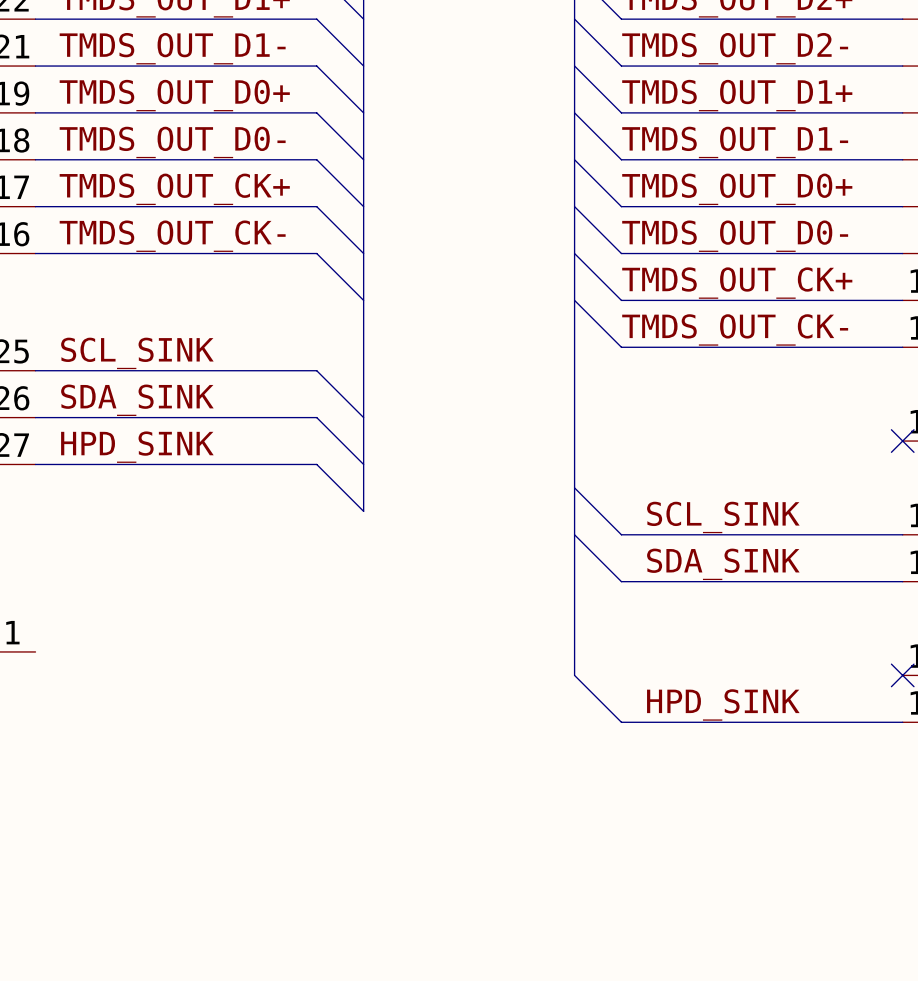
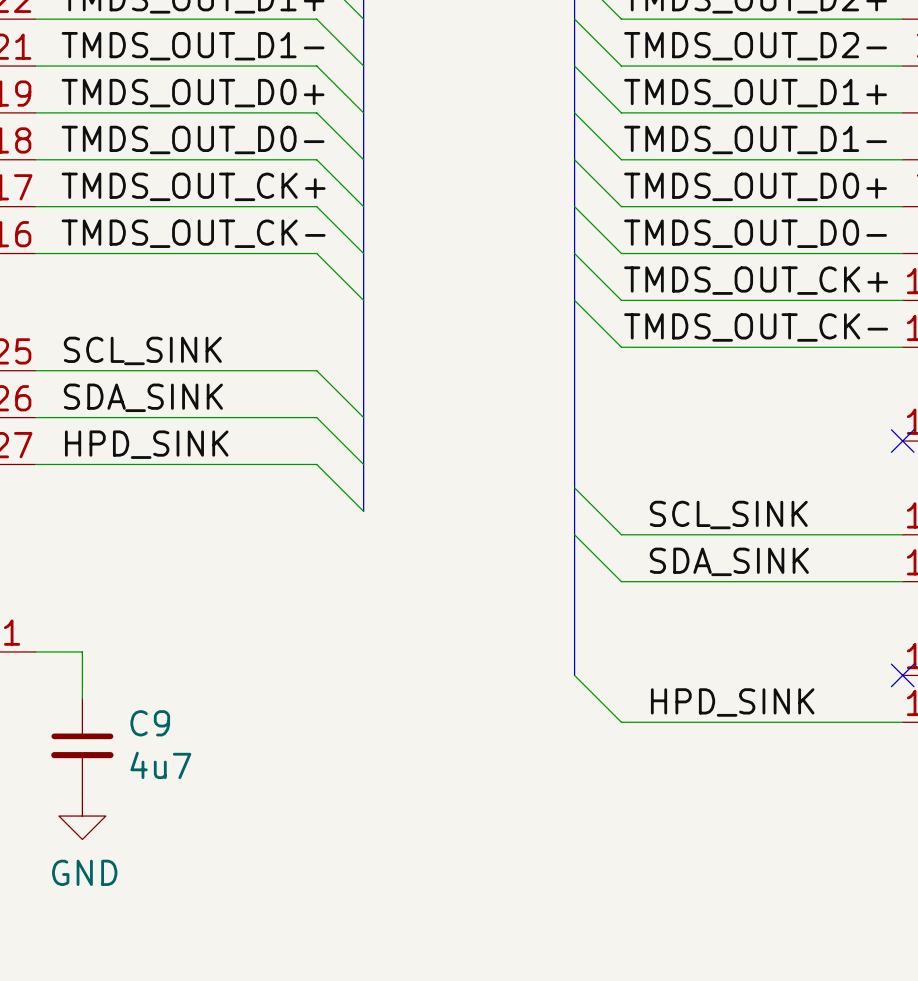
wire: none -> (35, 651) (82, 651) (82, 698)
C9: none -> 4u7 (82, 745)
power symbol: none -> GND (82, 816)

